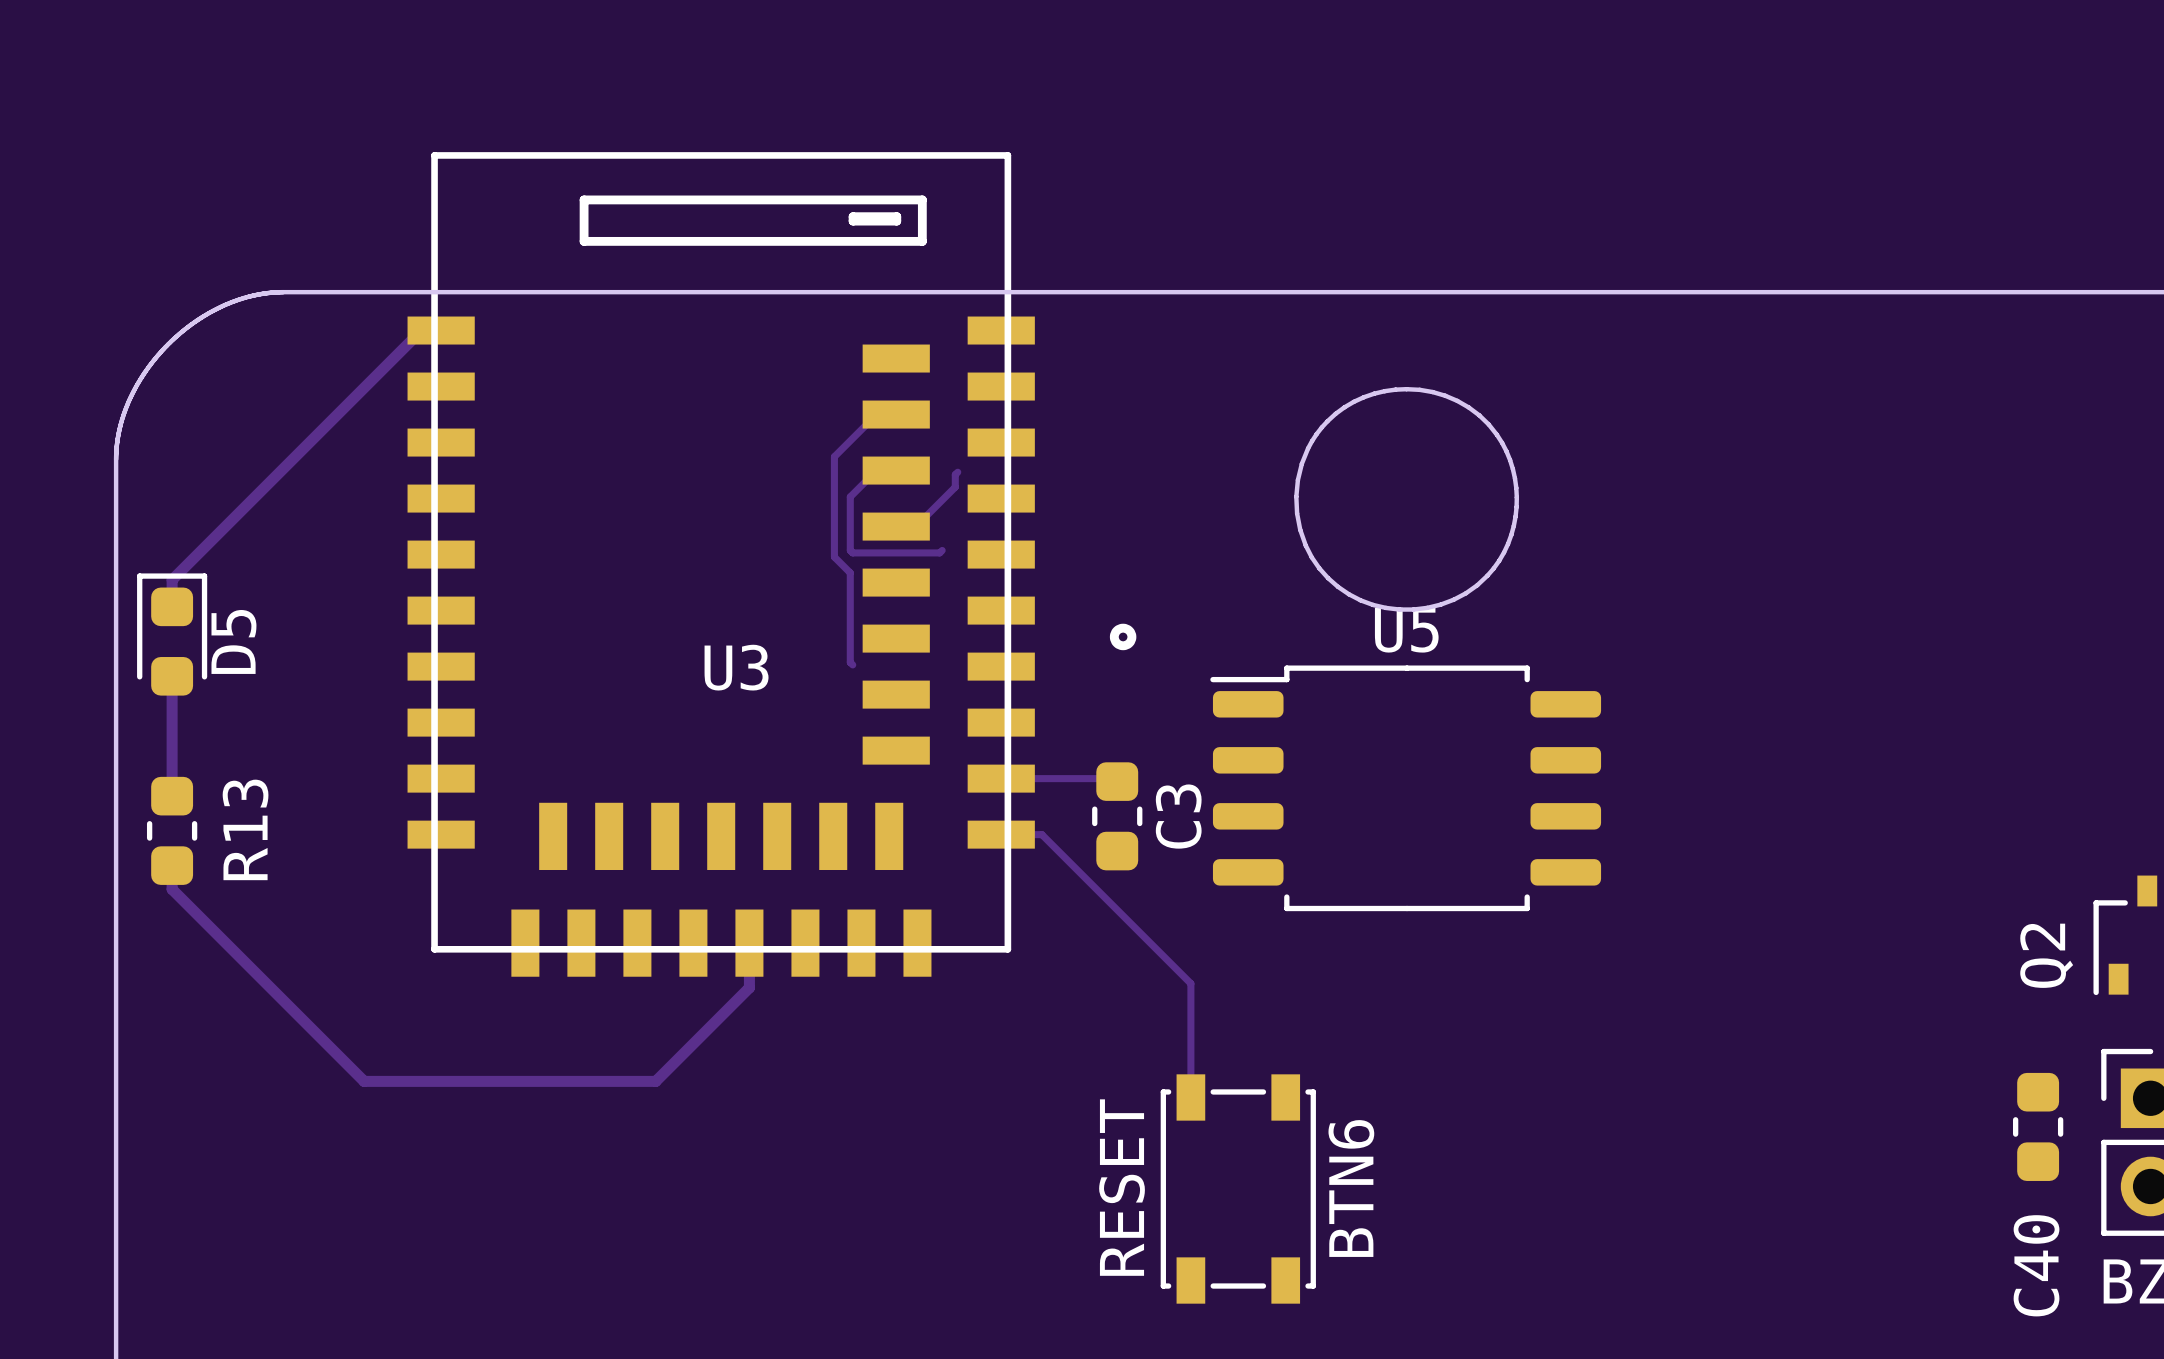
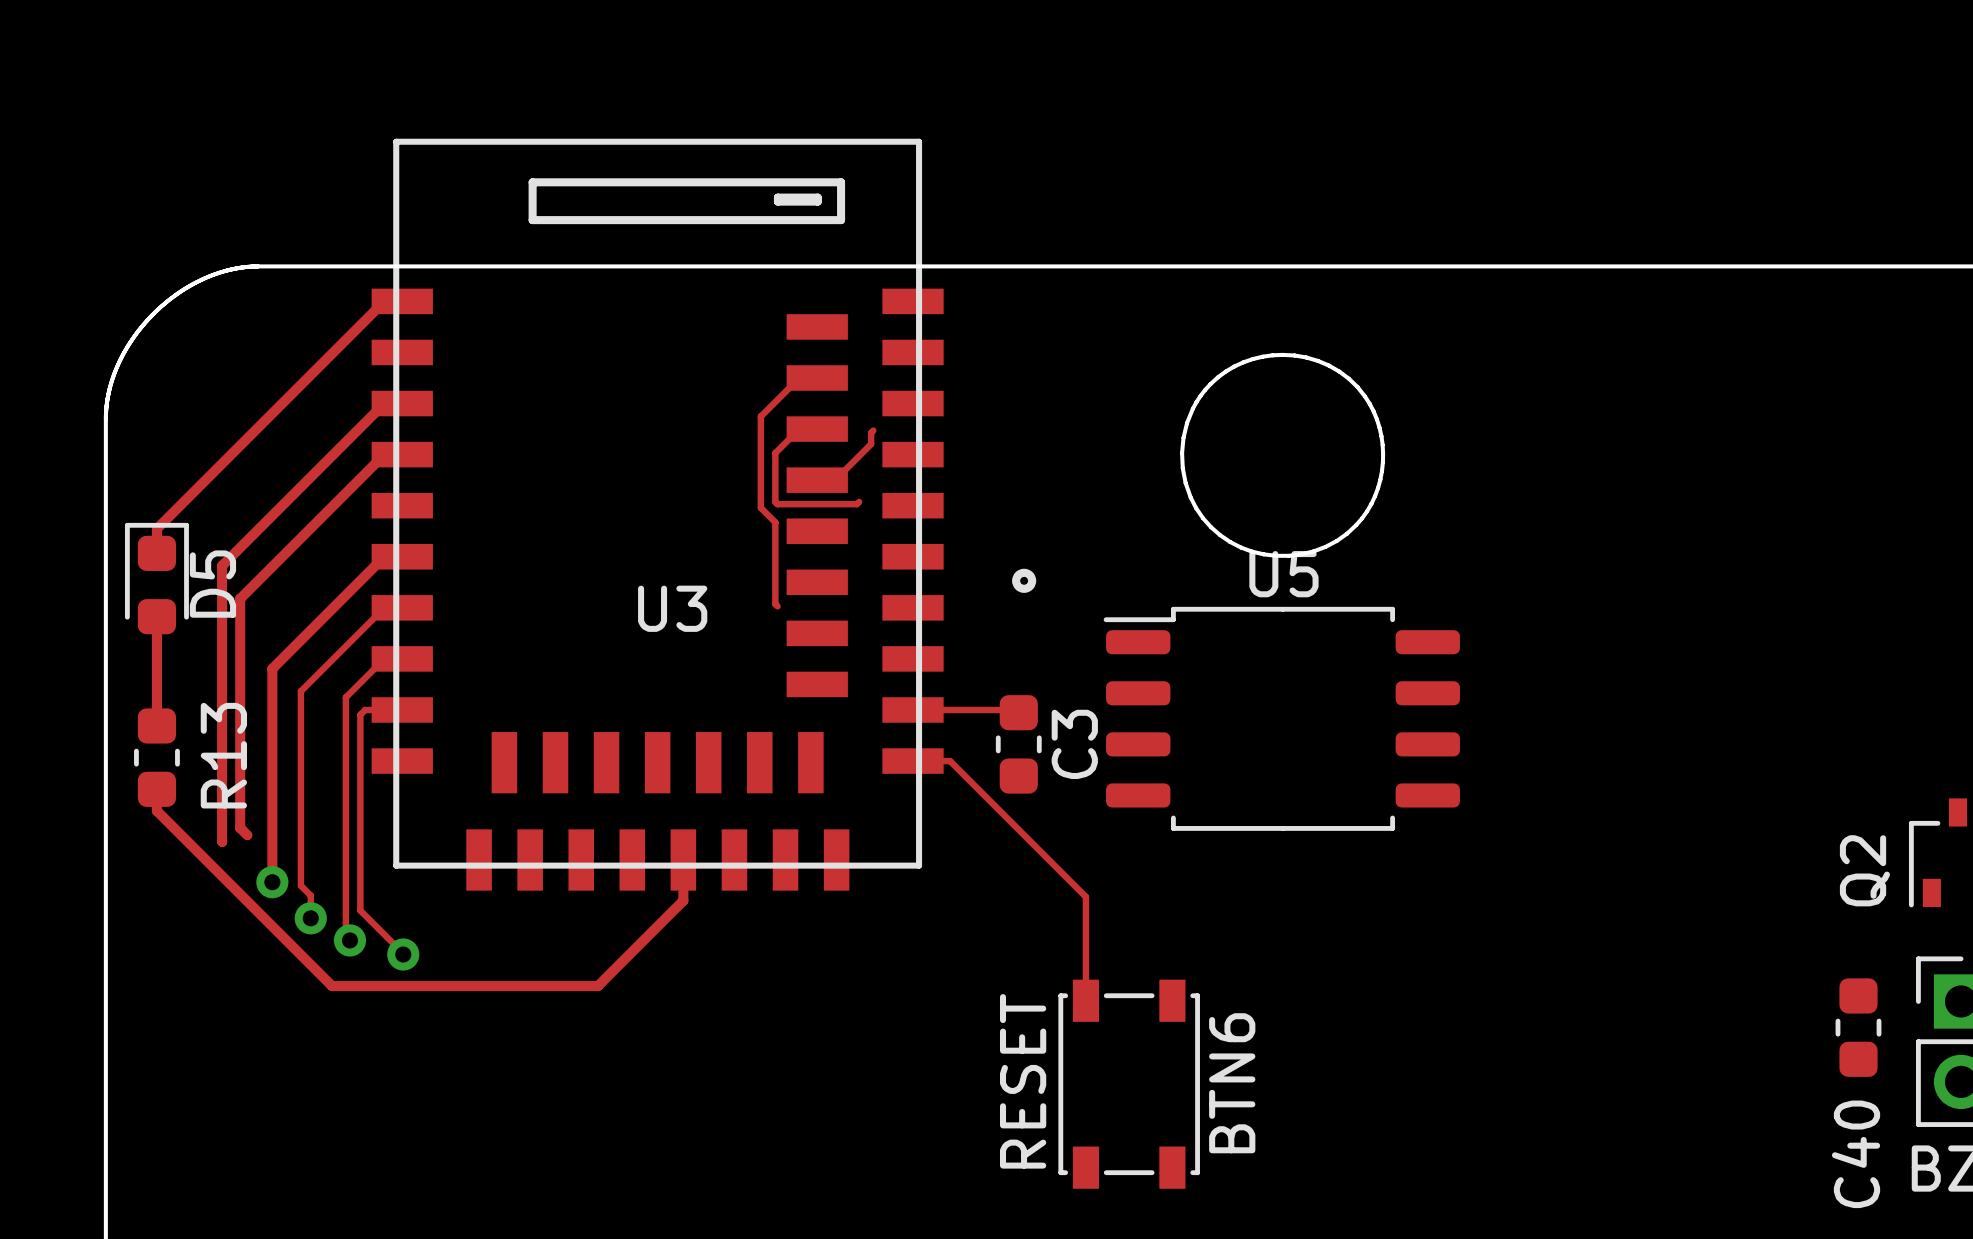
track: none -> (402, 403) (384, 403) (222, 565) (222, 841)
track: none -> (402, 454) (384, 454) (240, 598) (240, 828) (247, 835)
track: none -> (402, 556) (384, 556) (272, 668) (272, 882)
track: none -> (402, 607) (384, 607) (300, 691) (300, 885) (310, 895) (310, 918)
track: none -> (402, 658) (384, 658) (345, 697) (345, 936) (349, 940)
track: none -> (402, 710) (365, 710) (360, 714) (360, 910) (403, 954)
via: none -> (272, 882)
via: none -> (310, 918)
via: none -> (349, 940)
via: none -> (403, 954)

